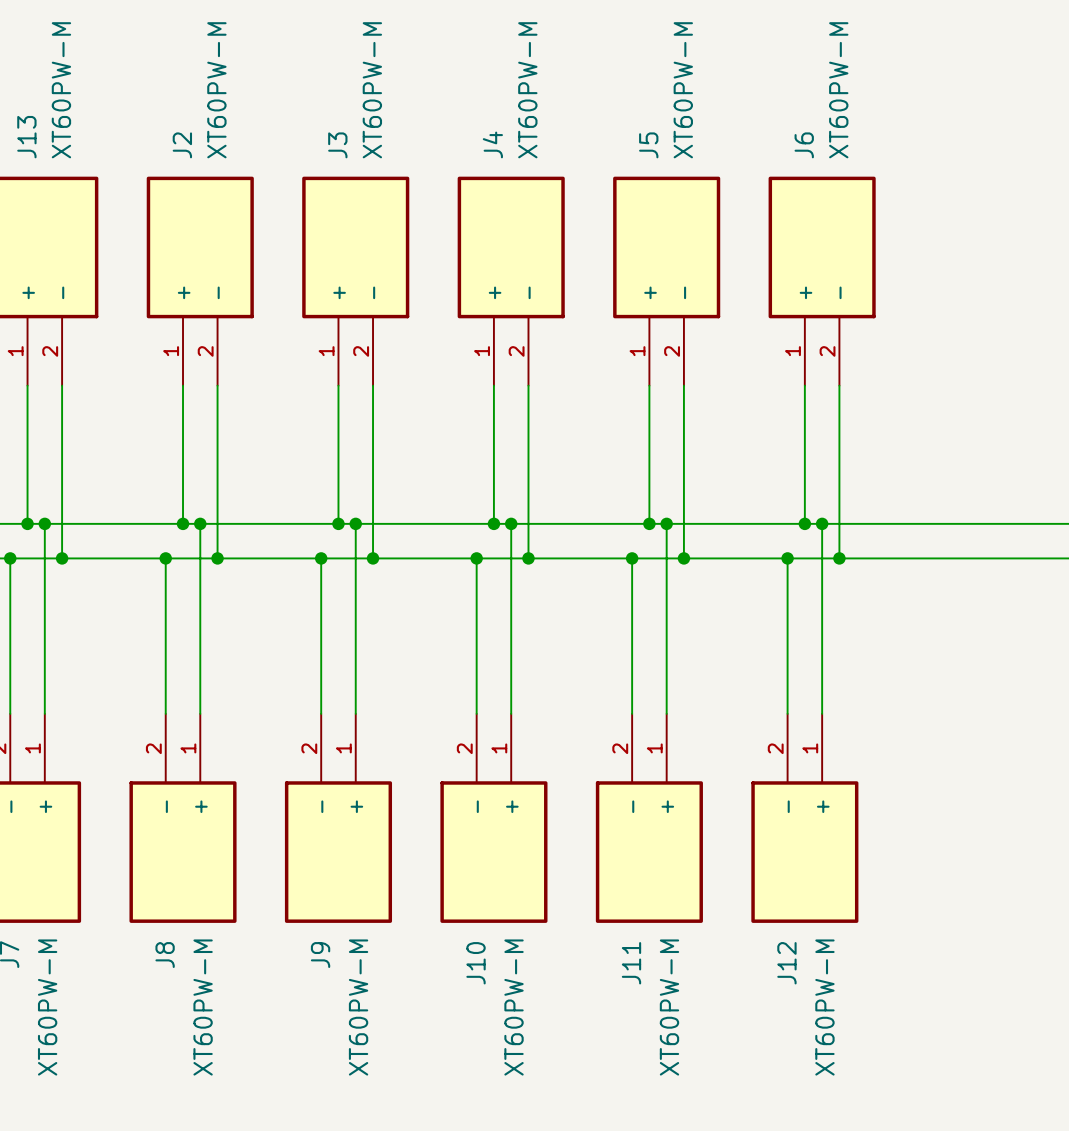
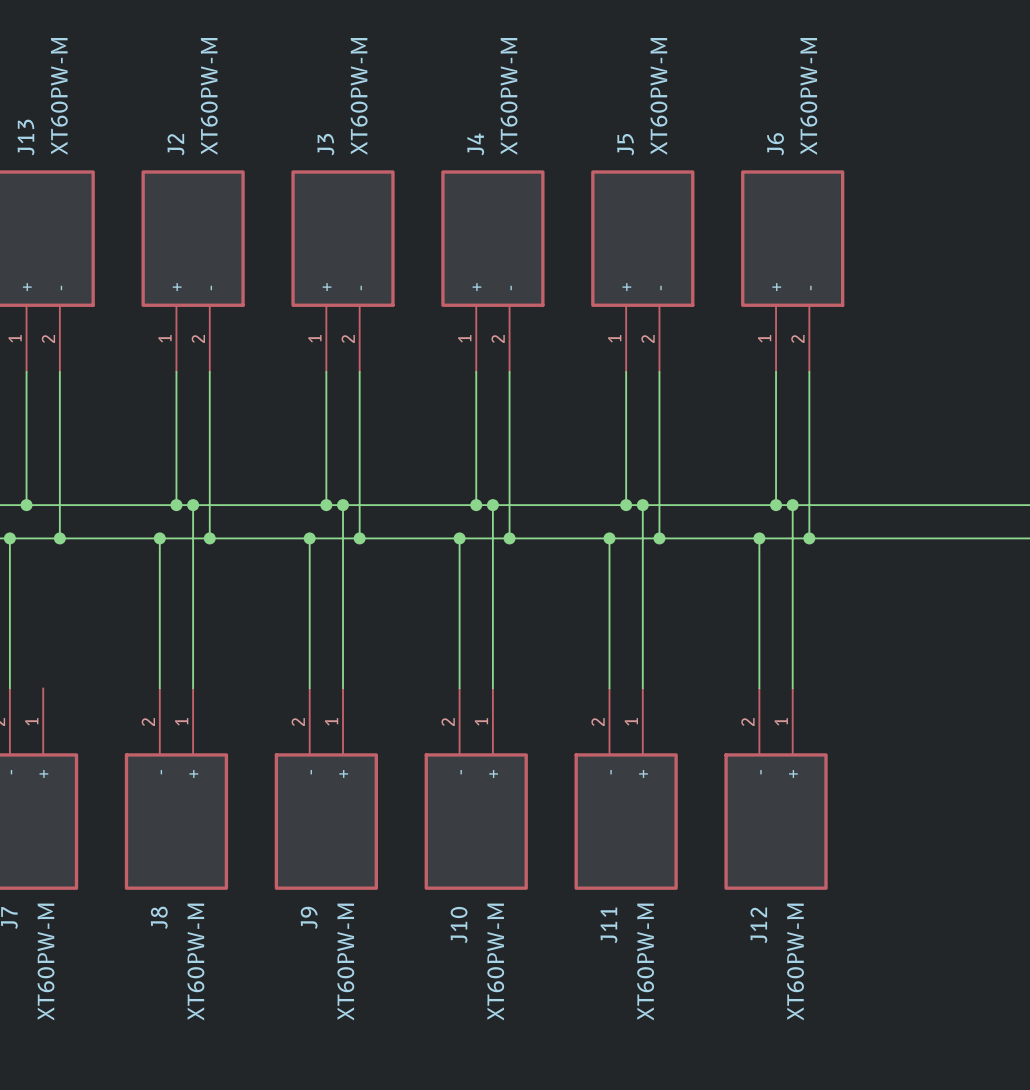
wire: (44, 523) (44, 713) -> none
junction: (44, 523) -> none

